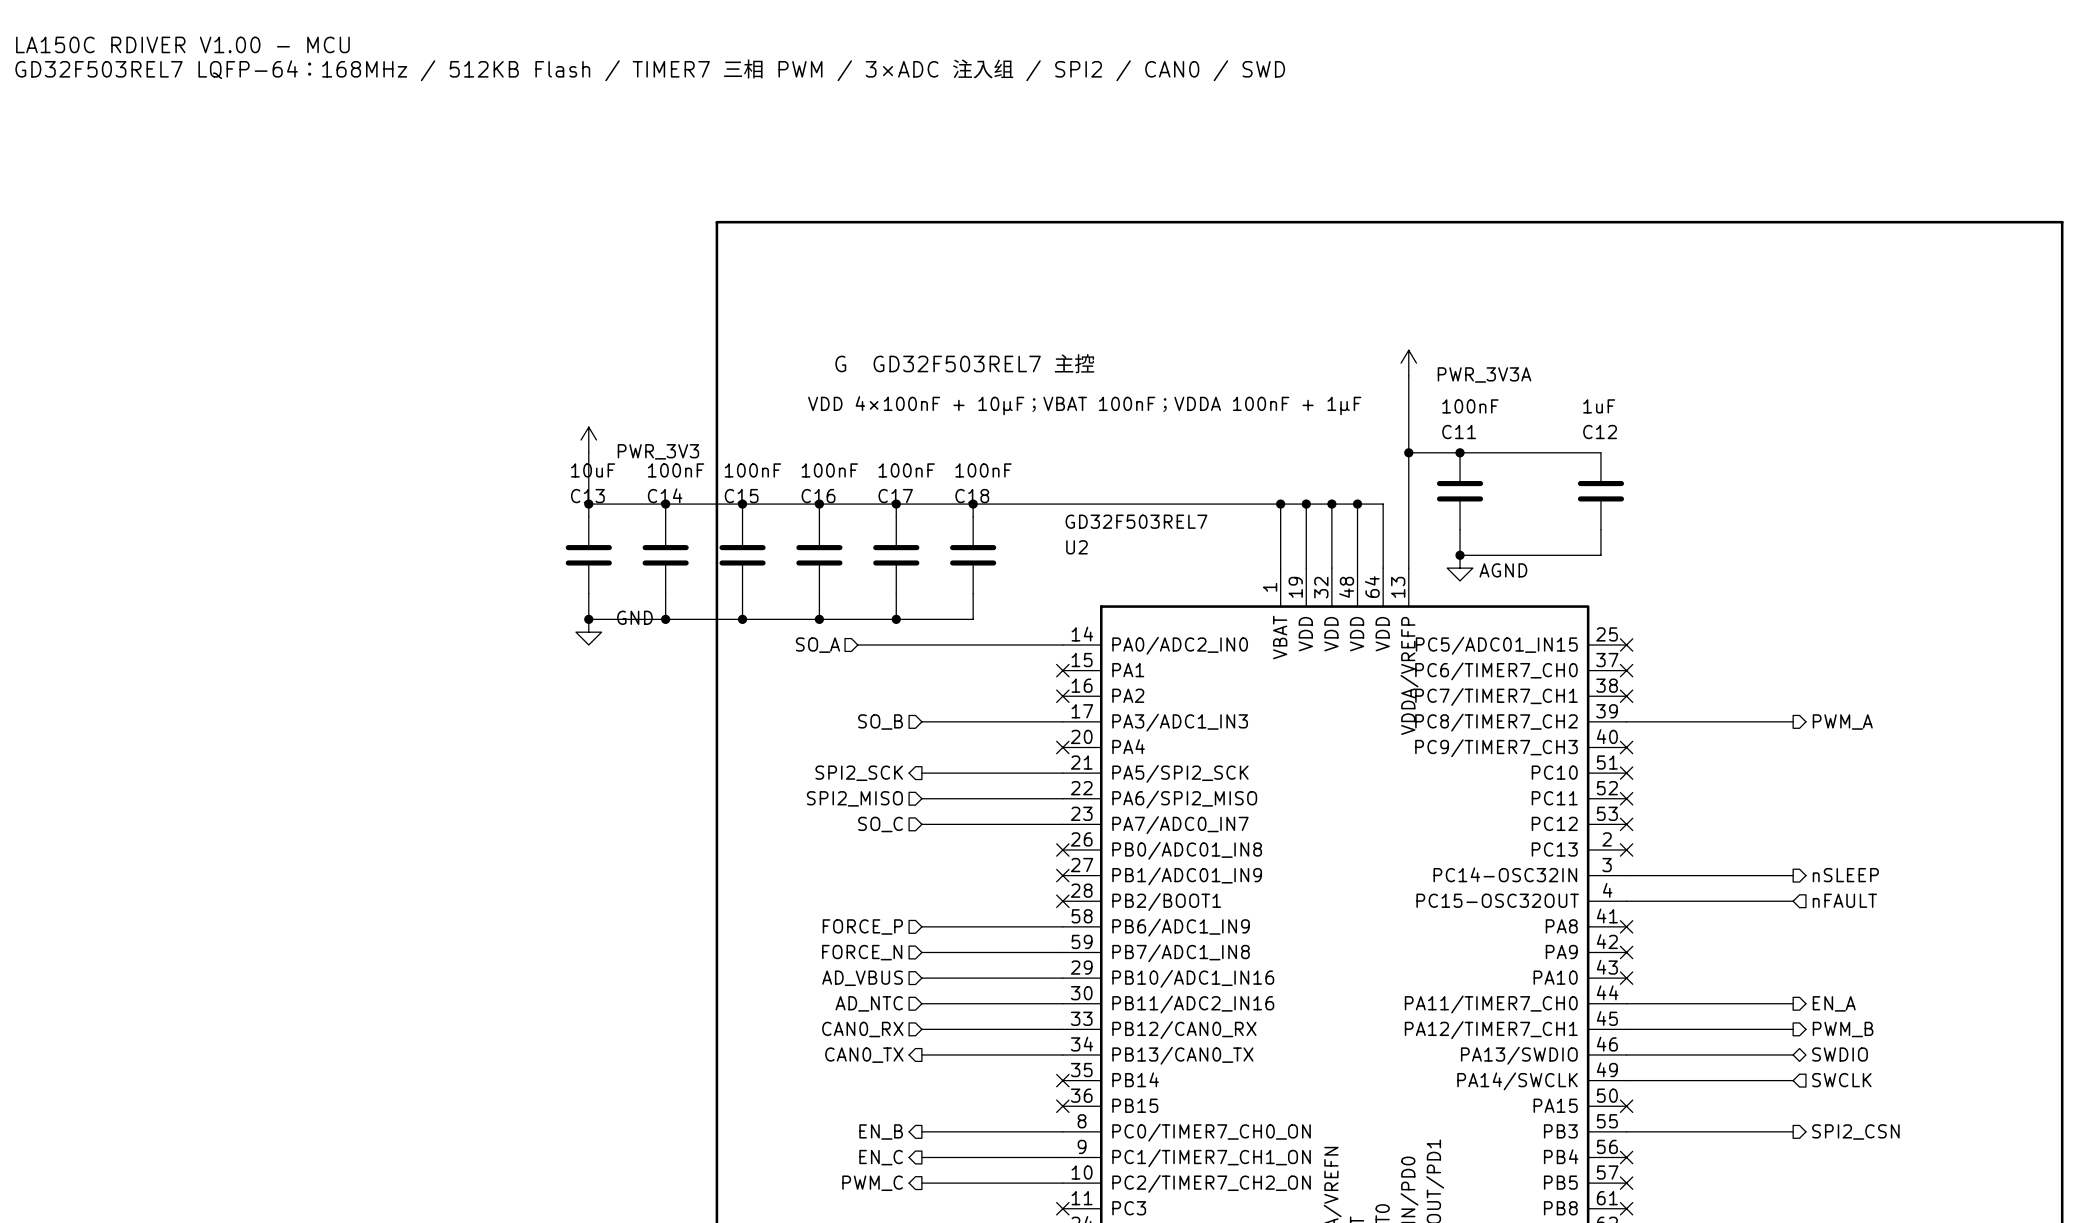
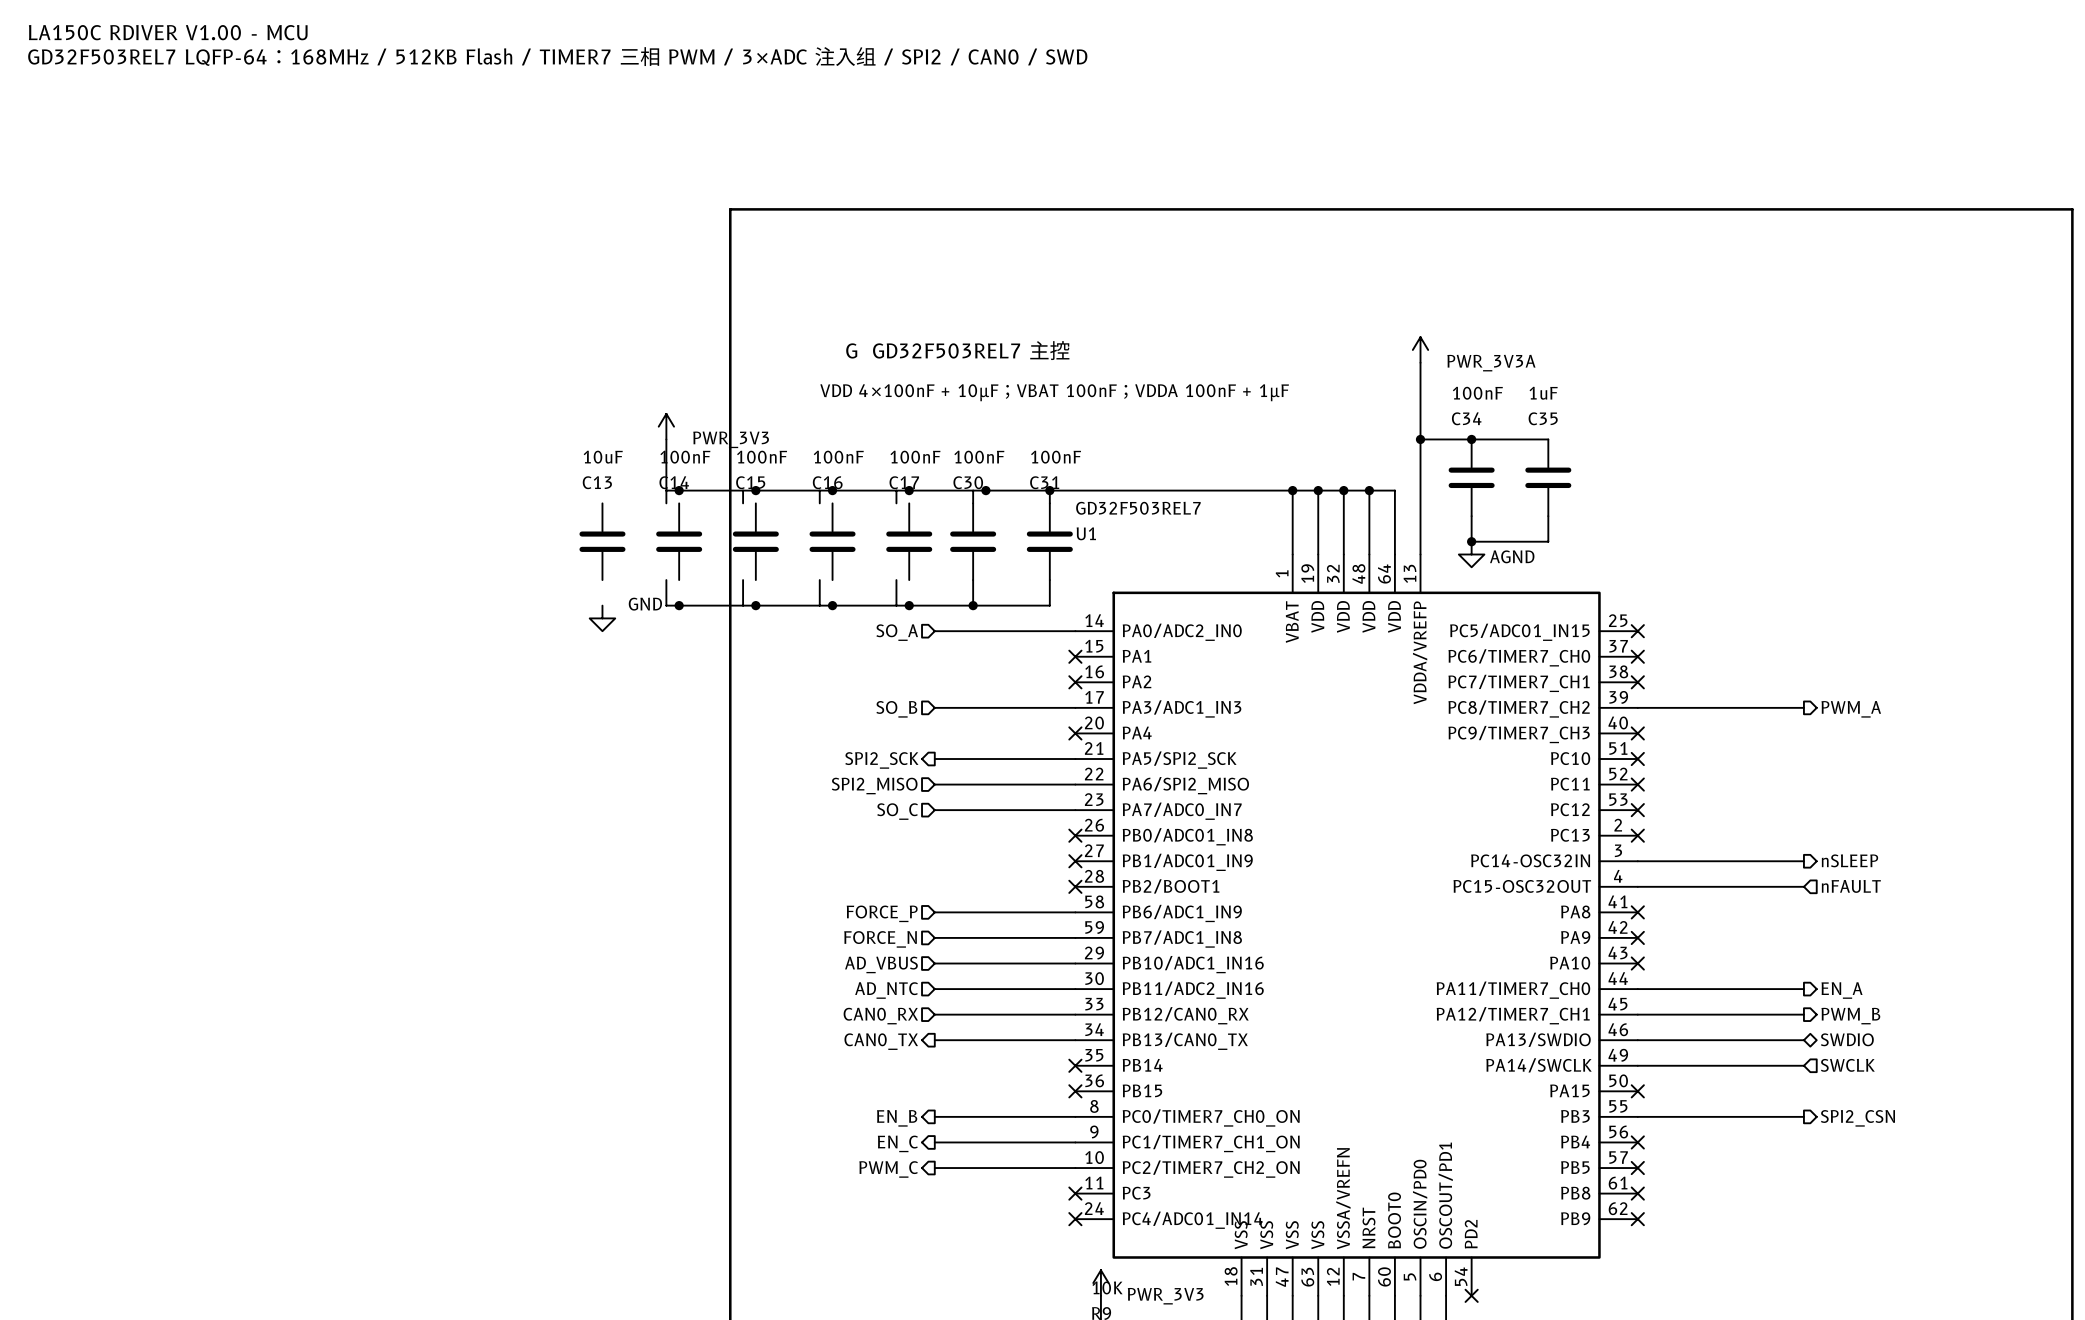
C11 name: C11 (1459, 432) -> C34 (1466, 418)
power symbol position: PWR_3V3 (588, 439) -> PWR_3V3 (666, 426)
wire: (588, 452) (588, 516) -> (666, 439) (666, 503)
wire: (1536, 452) (1600, 452) -> none
C35: none -> 1uF (1548, 477)
C12: 1uF (1600, 491) -> none
wire: (588, 504) (652, 504) -> none
junction: (588, 504) -> none
wire: (665, 504) (665, 516) -> (743, 490) (743, 503)
wire: (742, 504) (742, 516) -> (819, 490) (819, 503)
wire: (819, 504) (819, 516) -> (896, 490) (896, 503)
wire: (896, 504) (896, 516) -> (973, 490) (973, 503)
wire: (973, 504) (973, 516) -> (1049, 490) (1049, 503)
junction: none -> (1049, 490)
wire: (1600, 529) (1600, 555) (1536, 555) -> (1548, 516) (1548, 541)
U2 name: U2 (1076, 547) -> U1 (1086, 533)
C30: none -> 100nF (973, 541)
C18: 100nF (973, 555) -> none
C31: none -> 100nF (1049, 541)
wire: (588, 593) (588, 619) (652, 619) -> (666, 580) (666, 605)
wire: (665, 593) (665, 619) -> (743, 580) (743, 605)
wire: (742, 593) (742, 619) -> (819, 580) (819, 605)
wire: (819, 593) (819, 619) -> (896, 580) (896, 605)
wire: (896, 593) (896, 619) -> (973, 580) (973, 605)
wire: (973, 593) (973, 619) -> (1049, 580) (1049, 605) (985, 605)
junction: (588, 619) -> none
junction: none -> (973, 605)
wire: (857, 644) (921, 644) -> none
hierarchical label position: SO_A (817, 645) -> SO_A (897, 632)

